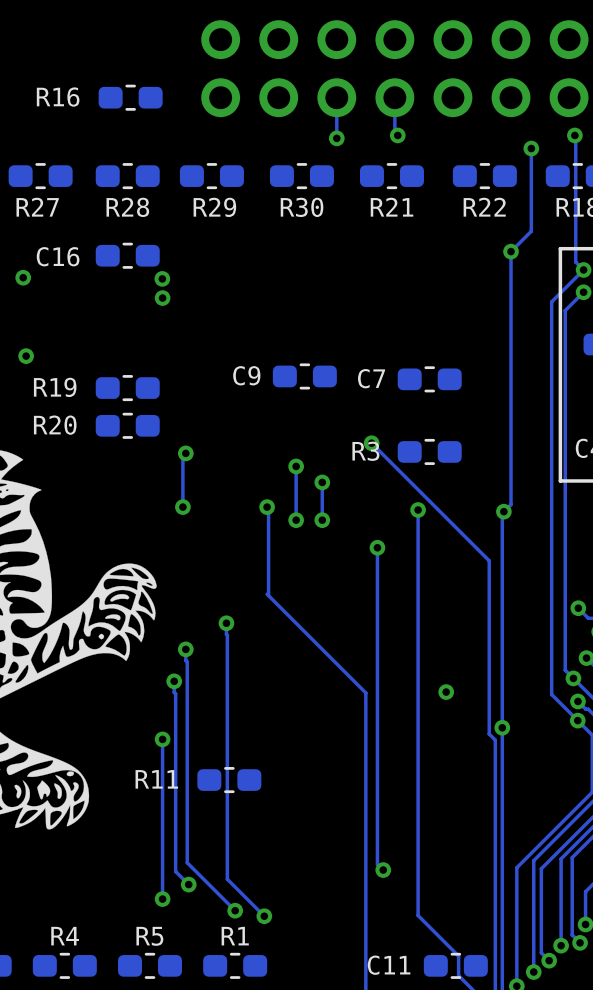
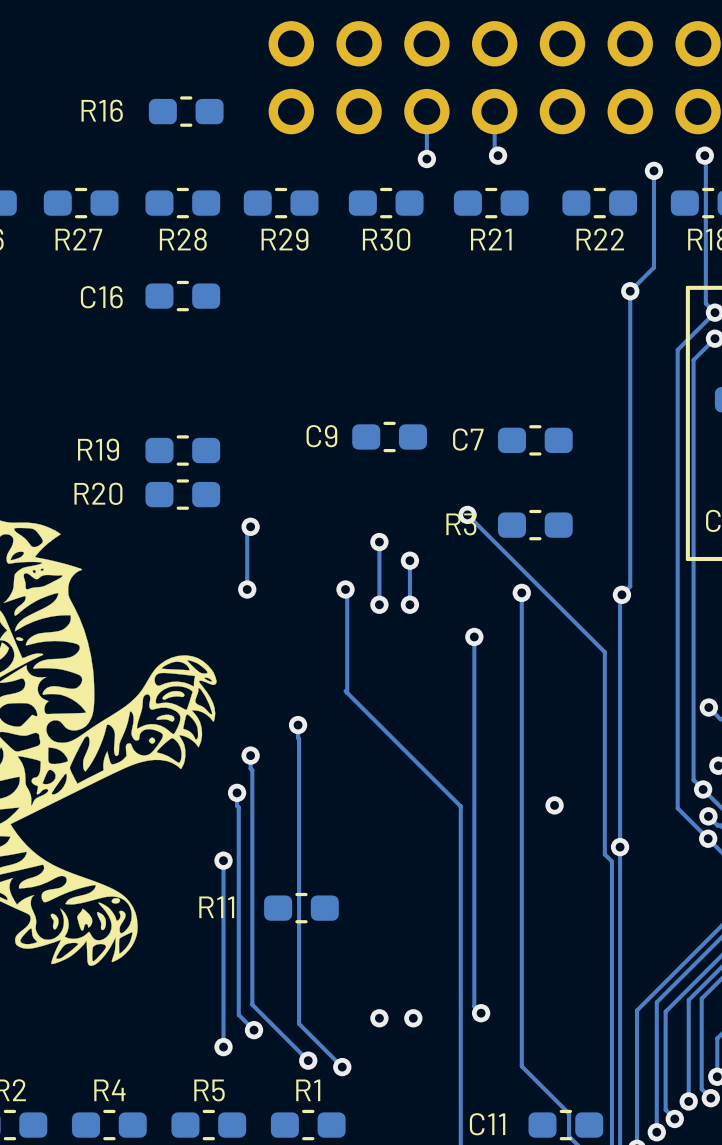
via: (23, 277) -> none
via: (162, 278) -> none
via: (162, 298) -> none
via: (26, 356) -> none
via: none -> (379, 1018)
via: none -> (413, 1018)

